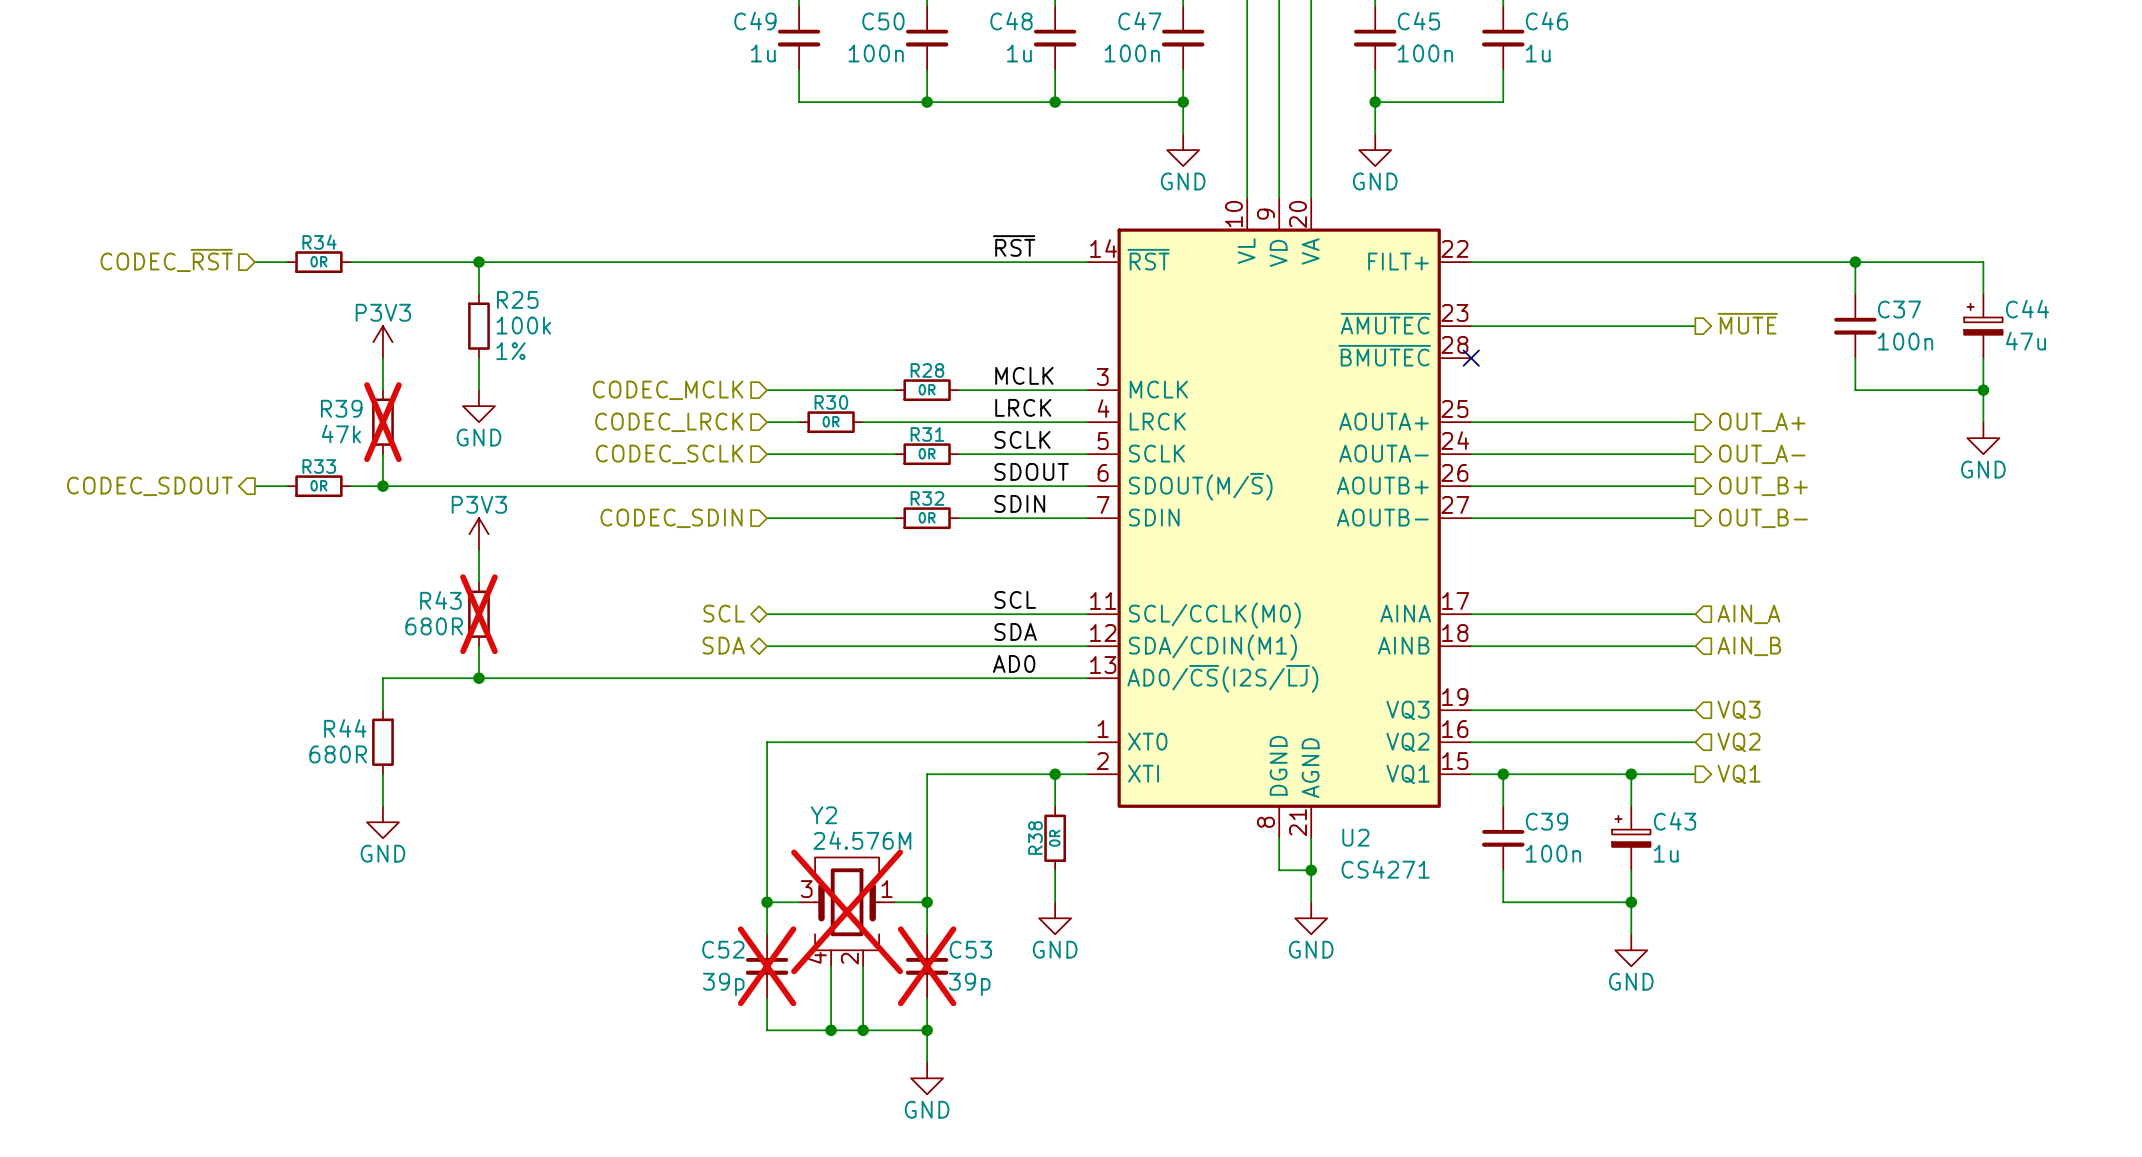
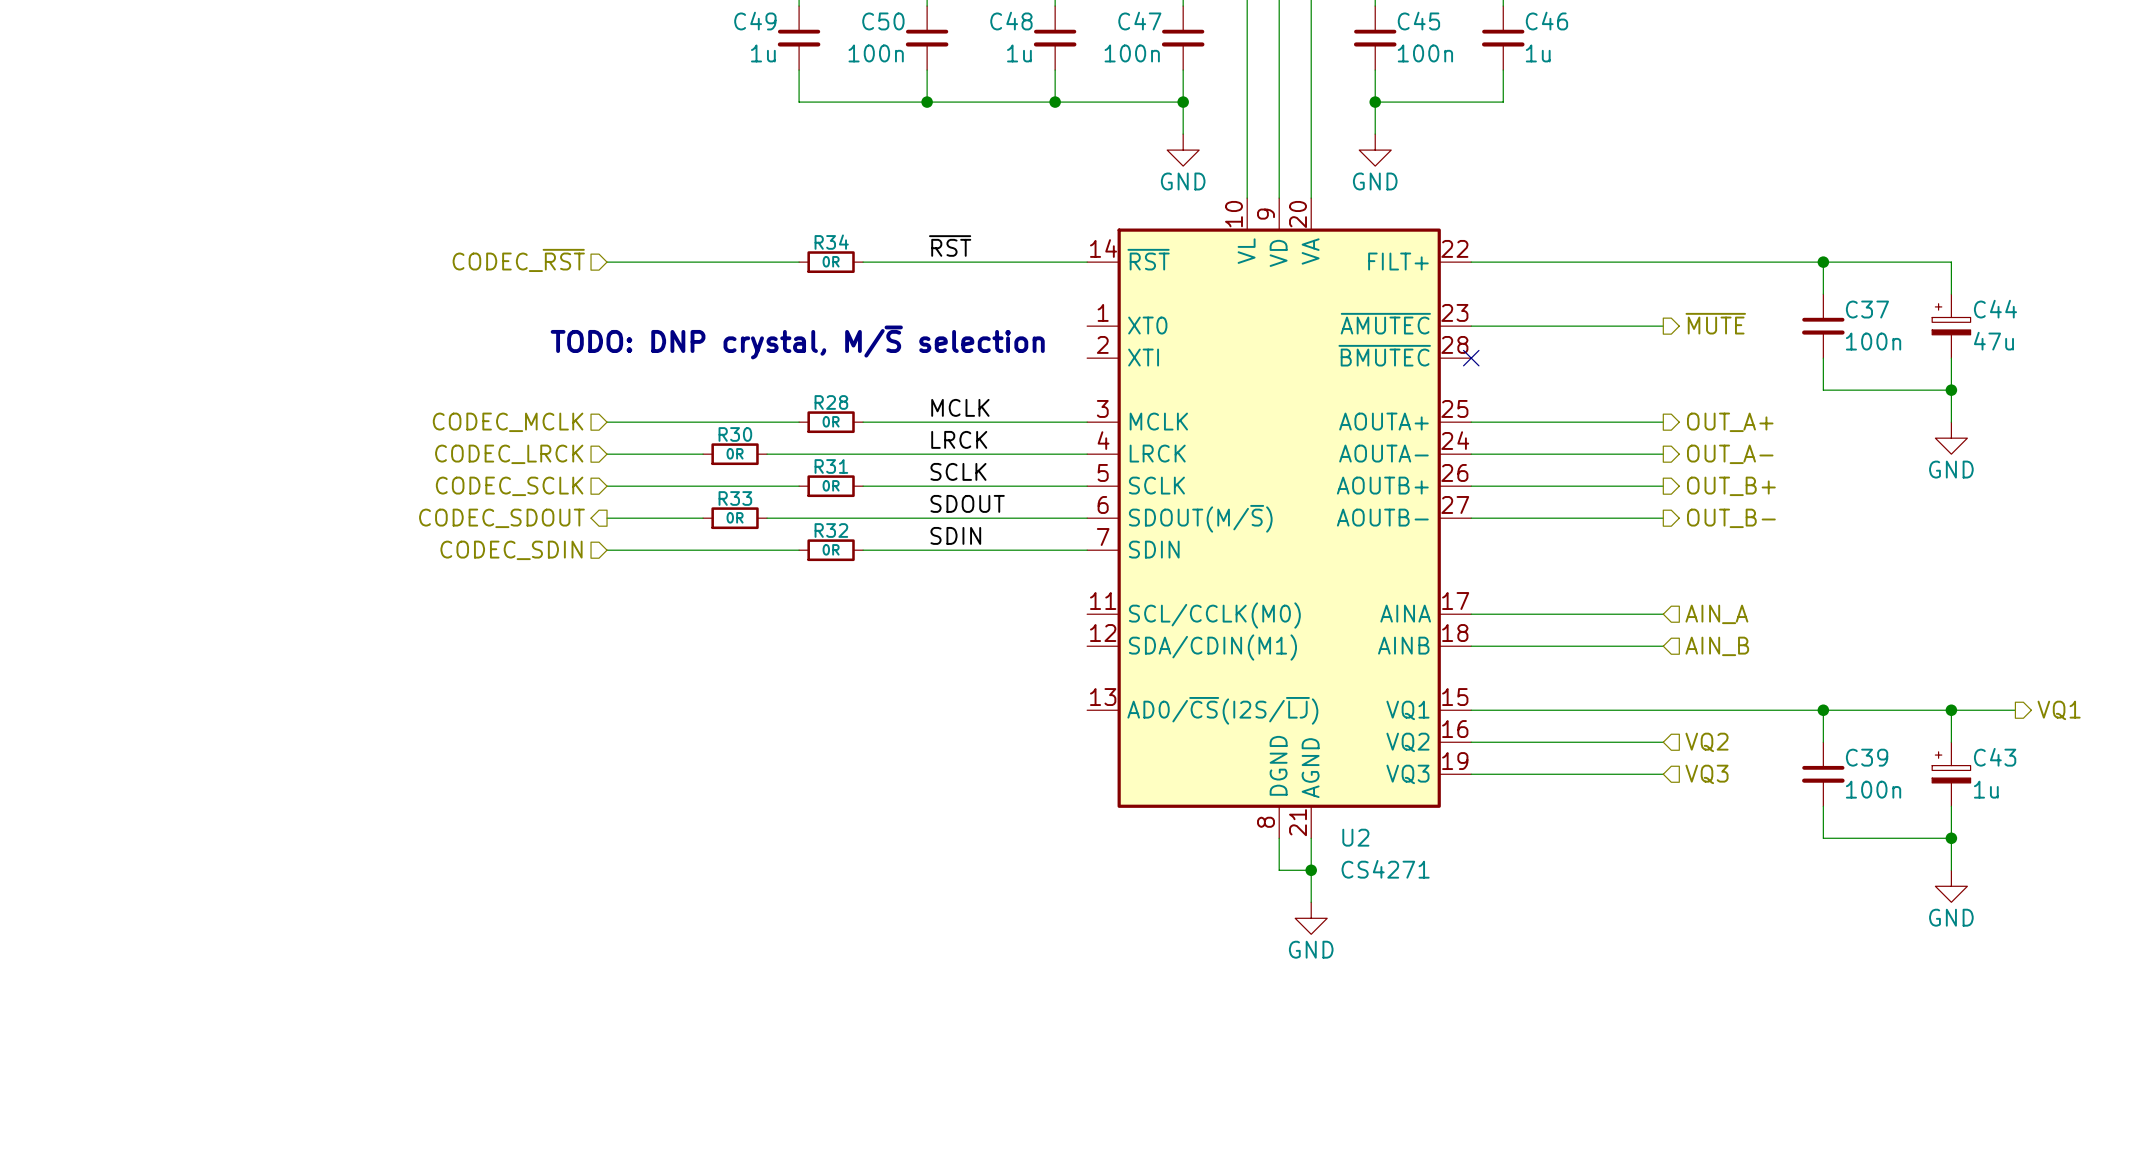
U2 symbol: [1087, 198, 1472, 839] -> [1087, 198, 1472, 839]
label position: ~{RST} (1014, 245) -> ~{RST} (950, 245)
hierarchical label: CODEC_~{RST} (166, 260) -> none
hierarchical label: none -> CODEC_~{RST} (518, 260)
wire: (254, 262) (286, 262) -> none
R34 position: (318, 262) -> (831, 262)
wire: (350, 262) (607, 262) -> none
wire: (478, 262) (478, 294) -> none
junction: (478, 262) -> none
wire: (799, 262) (863, 262) -> (895, 454) (959, 454)
wire: (1855, 262) (1855, 294) -> (1823, 262) (1823, 294)
junction position: (1855, 262) -> (1823, 262)
wire: (1951, 262) (1983, 262) (1983, 294) -> (1951, 262) (1951, 294)
hierarchical label position: ~{MUTE} (1747, 323) -> ~{MUTE} (1715, 323)
R25: 100k (478, 326) -> none
wire: (1663, 326) (1695, 326) -> none
C37 position: (1855, 326) -> (1823, 326)
C44 position: (1983, 326) -> (1951, 326)
power symbol: P3V3 (382, 342) -> none
text: none -> TODO: DNP crystal, M/~{S} selection (797, 342)
wire: (382, 358) (382, 390) -> none
wire: (478, 358) (478, 390) -> none
wire: (1855, 358) (1855, 390) -> (1823, 358) (1823, 390) (1855, 390)
wire: (1983, 358) (1983, 422) -> (1951, 358) (1951, 422)
label position: MCLK (1024, 375) -> MCLK (960, 407)
hierarchical label position: CODEC_MCLK (668, 390) -> CODEC_MCLK (508, 422)
wire: (767, 390) (895, 390) -> none
R28: 0R (927, 390) -> none
wire: (959, 390) (1087, 390) -> none
wire: (1951, 390) (1983, 390) -> none
junction position: (1983, 390) -> (1951, 390)
R30 name: R30 (831, 402) -> R28 (831, 402)
power symbol: GND (478, 406) -> none
label position: LRCK (1023, 407) -> LRCK (959, 439)
R39: 47k (382, 422) -> none
wire: none -> (607, 422) (767, 422)
hierarchical label position: CODEC_LRCK (669, 422) -> CODEC_LRCK (509, 454)
wire: (1663, 422) (1695, 422) -> none
hierarchical label position: OUT_A+ (1762, 422) -> OUT_A+ (1730, 422)
power symbol position: GND (1983, 438) -> GND (1951, 438)
label position: SCLK (1022, 439) -> SCLK (958, 471)
wire: (382, 454) (382, 486) -> none
wire: none -> (607, 454) (703, 454)
hierarchical label position: CODEC_SCLK (669, 454) -> CODEC_SCLK (509, 486)
R30: none -> 0R (735, 454)
R31 position: (927, 454) -> (831, 486)
wire: (1663, 454) (1695, 454) -> none
hierarchical label position: OUT_A- (1762, 454) -> OUT_A- (1730, 454)
label position: SDOUT (1031, 471) -> SDOUT (967, 503)
hierarchical label: CODEC_SDOUT (149, 486) -> none
wire: (254, 486) (286, 486) -> none
R33 position: (318, 486) -> (735, 518)
wire: (350, 486) (607, 486) -> none
junction: (382, 486) -> none
wire: (799, 486) (863, 486) -> (895, 518) (959, 518)
wire: (1663, 486) (1695, 486) -> none
hierarchical label position: OUT_B+ (1763, 486) -> OUT_B+ (1731, 486)
label position: SDIN (1019, 503) -> SDIN (955, 535)
hierarchical label: none -> CODEC_SDOUT (501, 518)
wire: none -> (607, 518) (703, 518)
hierarchical label position: CODEC_SDIN (671, 518) -> CODEC_SDIN (511, 550)
R32 position: (927, 518) -> (831, 550)
wire: (1663, 518) (1695, 518) -> none
hierarchical label position: OUT_B- (1763, 518) -> OUT_B- (1731, 518)
power symbol: P3V3 (478, 534) -> none
wire: (478, 550) (478, 582) -> none
wire: none -> (607, 550) (799, 550)
wire: none -> (863, 550) (1087, 550)
label: SCL (1015, 599) -> none
hierarchical label: SCL (724, 613) -> none
R43: 680R (478, 614) -> none
wire: (767, 614) (1087, 614) -> none
wire: (1663, 614) (1695, 614) -> none
hierarchical label position: AIN_A (1748, 614) -> AIN_A (1716, 614)
label: SDA (1015, 631) -> none
hierarchical label: SDA (723, 645) -> none
wire: (478, 646) (478, 678) -> none
wire: (767, 646) (1087, 646) -> none
wire: (1663, 646) (1695, 646) -> none
hierarchical label position: AIN_B (1749, 646) -> AIN_B (1717, 646)
label: AD0 (1014, 663) -> none
junction: (478, 678) -> none
wire: (1087, 678) (382, 678) (382, 710) -> none
wire: none -> (1695, 710) (2015, 710)
hierarchical label position: VQ3 (1739, 710) -> VQ3 (1707, 774)
junction: none -> (1823, 710)
wire: none -> (1951, 710) (1951, 742)
junction: none -> (1951, 710)
hierarchical label: none -> VQ1 (2059, 710)
R44: 680R (382, 742) -> none
wire: (1087, 742) (767, 742) (767, 934) -> none
wire: (1663, 742) (1695, 742) -> none
hierarchical label position: VQ2 (1739, 742) -> VQ2 (1707, 742)
wire: (382, 774) (382, 806) -> none
wire: (1055, 774) (1055, 806) -> none
junction: (1055, 774) -> none
wire: (1087, 774) (927, 774) (927, 934) -> none
wire: (1503, 774) (1503, 806) -> none
junction: (1503, 774) -> none
wire: (1631, 774) (1631, 806) -> (1823, 710) (1823, 742)
junction: (1631, 774) -> none
wire: (1663, 774) (1695, 774) -> none
hierarchical label: VQ1 (1739, 774) -> none
wire: none -> (1823, 806) (1823, 838) (1951, 838)
wire: none -> (1951, 806) (1951, 870)
power symbol: GND (382, 822) -> none
R38: 0R (1055, 838) -> none
C39 position: (1503, 838) -> (1823, 774)
C43 position: (1631, 838) -> (1951, 774)
junction: none -> (1951, 838)
wire: (1055, 870) (1055, 902) -> none
wire: (1503, 870) (1503, 902) (1631, 902) -> none
wire: (1631, 870) (1631, 934) -> none
power symbol: none -> GND (1951, 886)
wire: (767, 902) (799, 902) -> none
junction: (767, 902) -> none
wire: (895, 902) (927, 902) -> none
junction: (927, 902) -> none
junction: (1631, 902) -> none
Y2: 24.576M (847, 911) -> none
power symbol: GND (1055, 918) -> none
power symbol: GND (1631, 950) -> none
C52: 39p (767, 966) -> none
wire: (831, 966) (831, 1030) -> none
wire: (863, 966) (863, 1030) -> none
C53: 39p (927, 966) -> none
wire: (767, 998) (767, 1030) (927, 1030) -> none
wire: (927, 998) (927, 1062) -> none
junction: (831, 1030) -> none
junction: (863, 1030) -> none
junction: (927, 1030) -> none
power symbol: GND (927, 1078) -> none

